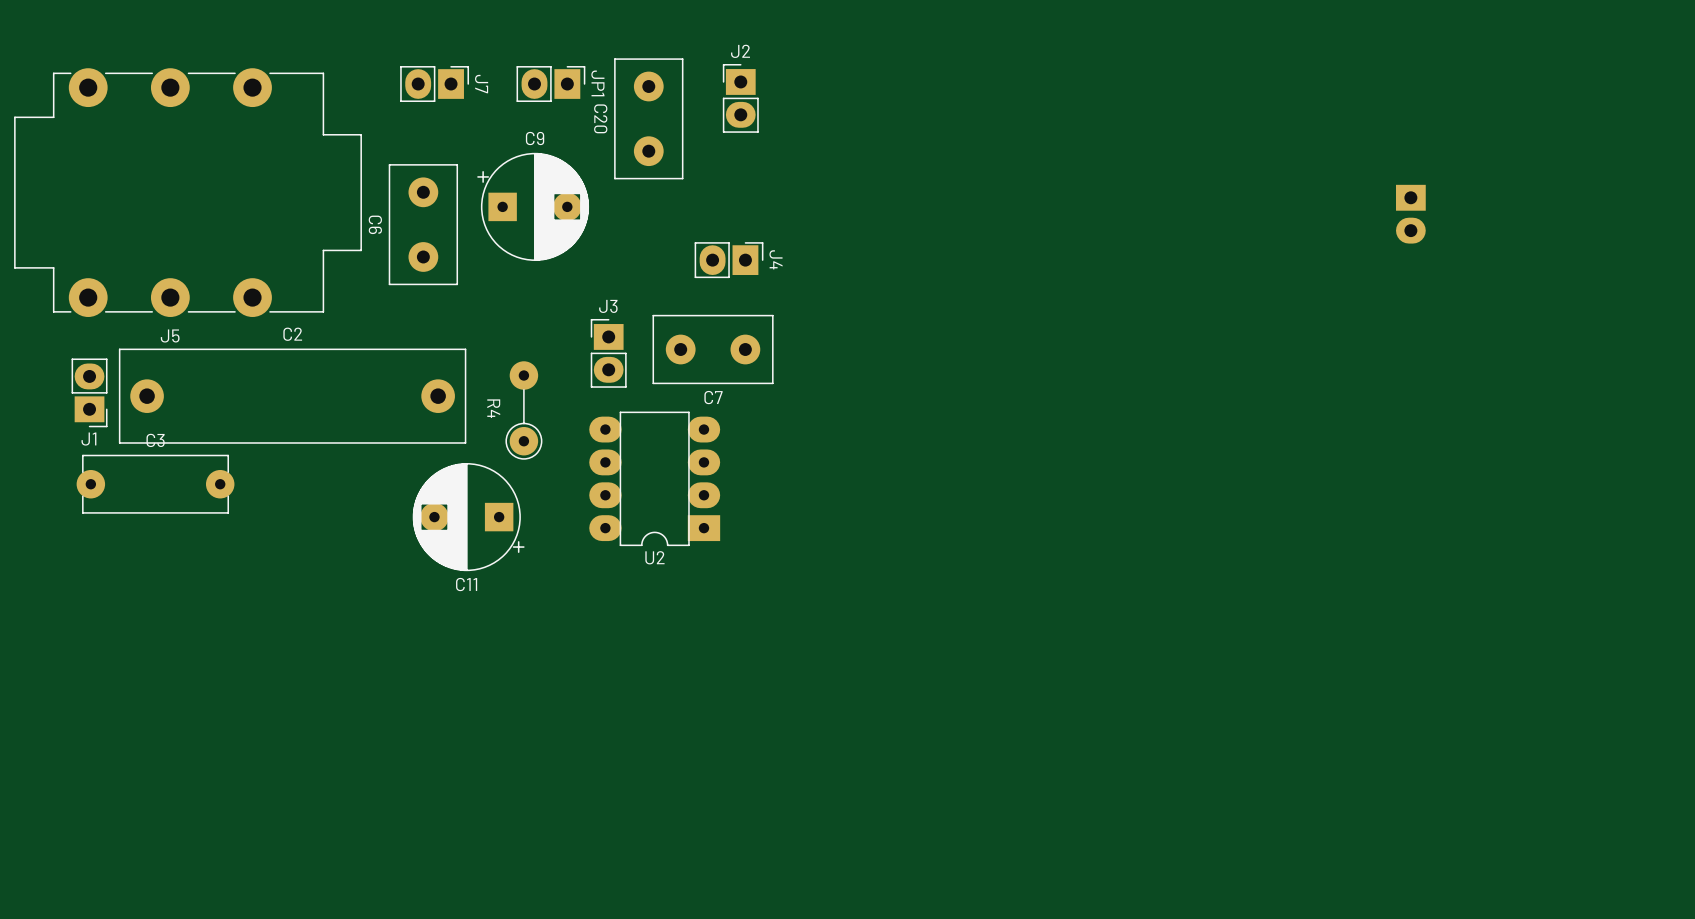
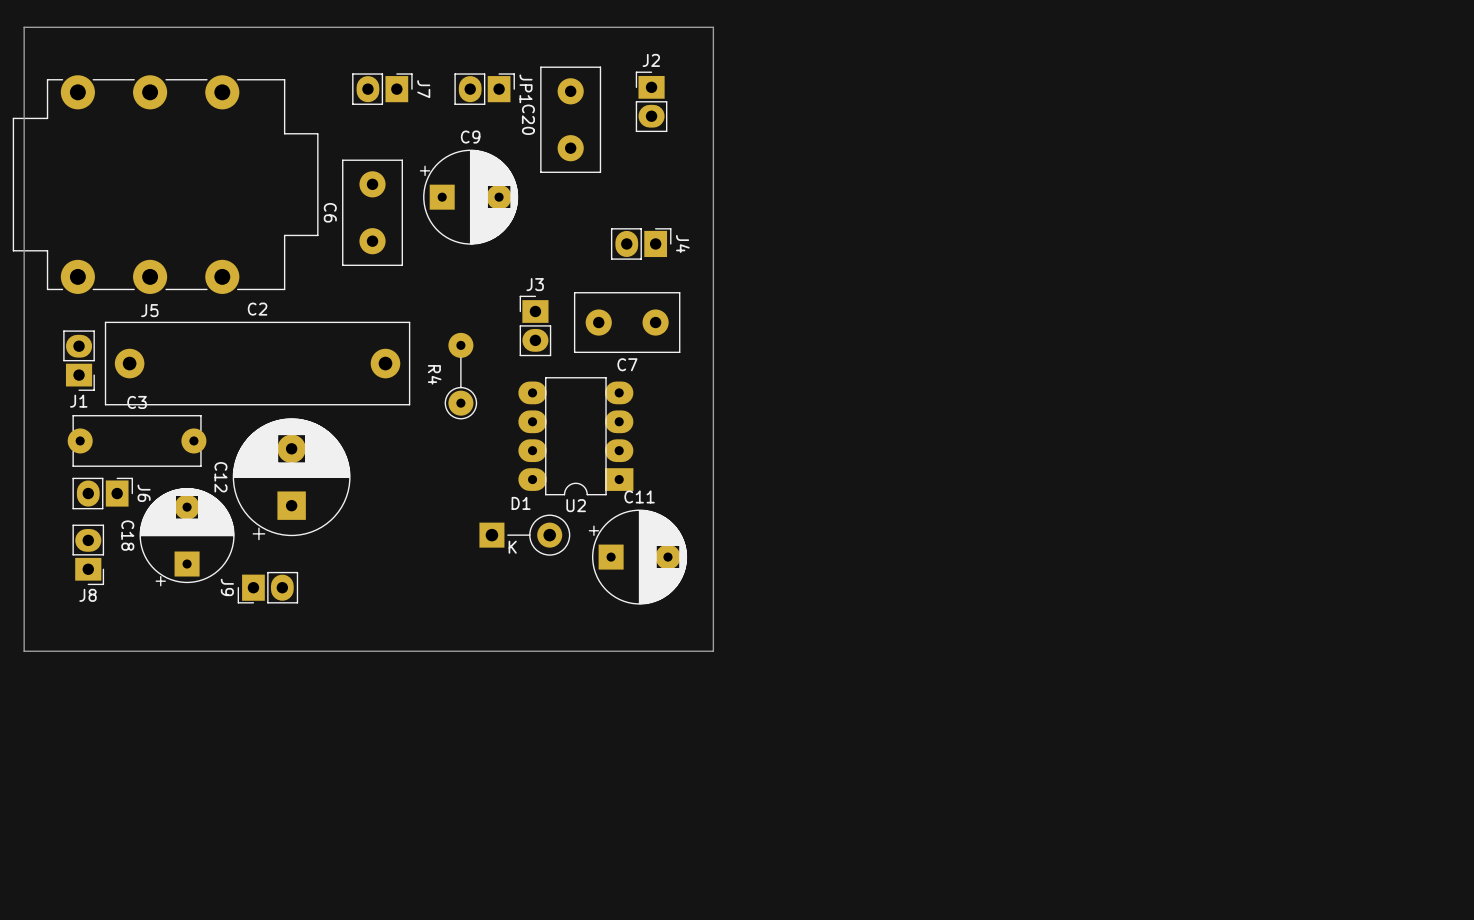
board edge: none -> (713, 27) (24, 27) (24, 651) (713, 651) (713, 27)
part: (1410, 214) -> none
C11 rotation: 0° (468, 517) -> 180° (637, 557)
C11 position: (468, 517) -> (637, 557)
C12: none -> (291, 479)
J6: none -> (102, 493)
D1: none -> (524, 535)
C18: none -> (187, 537)
J8: none -> (88, 554)
J9: none -> (267, 587)

